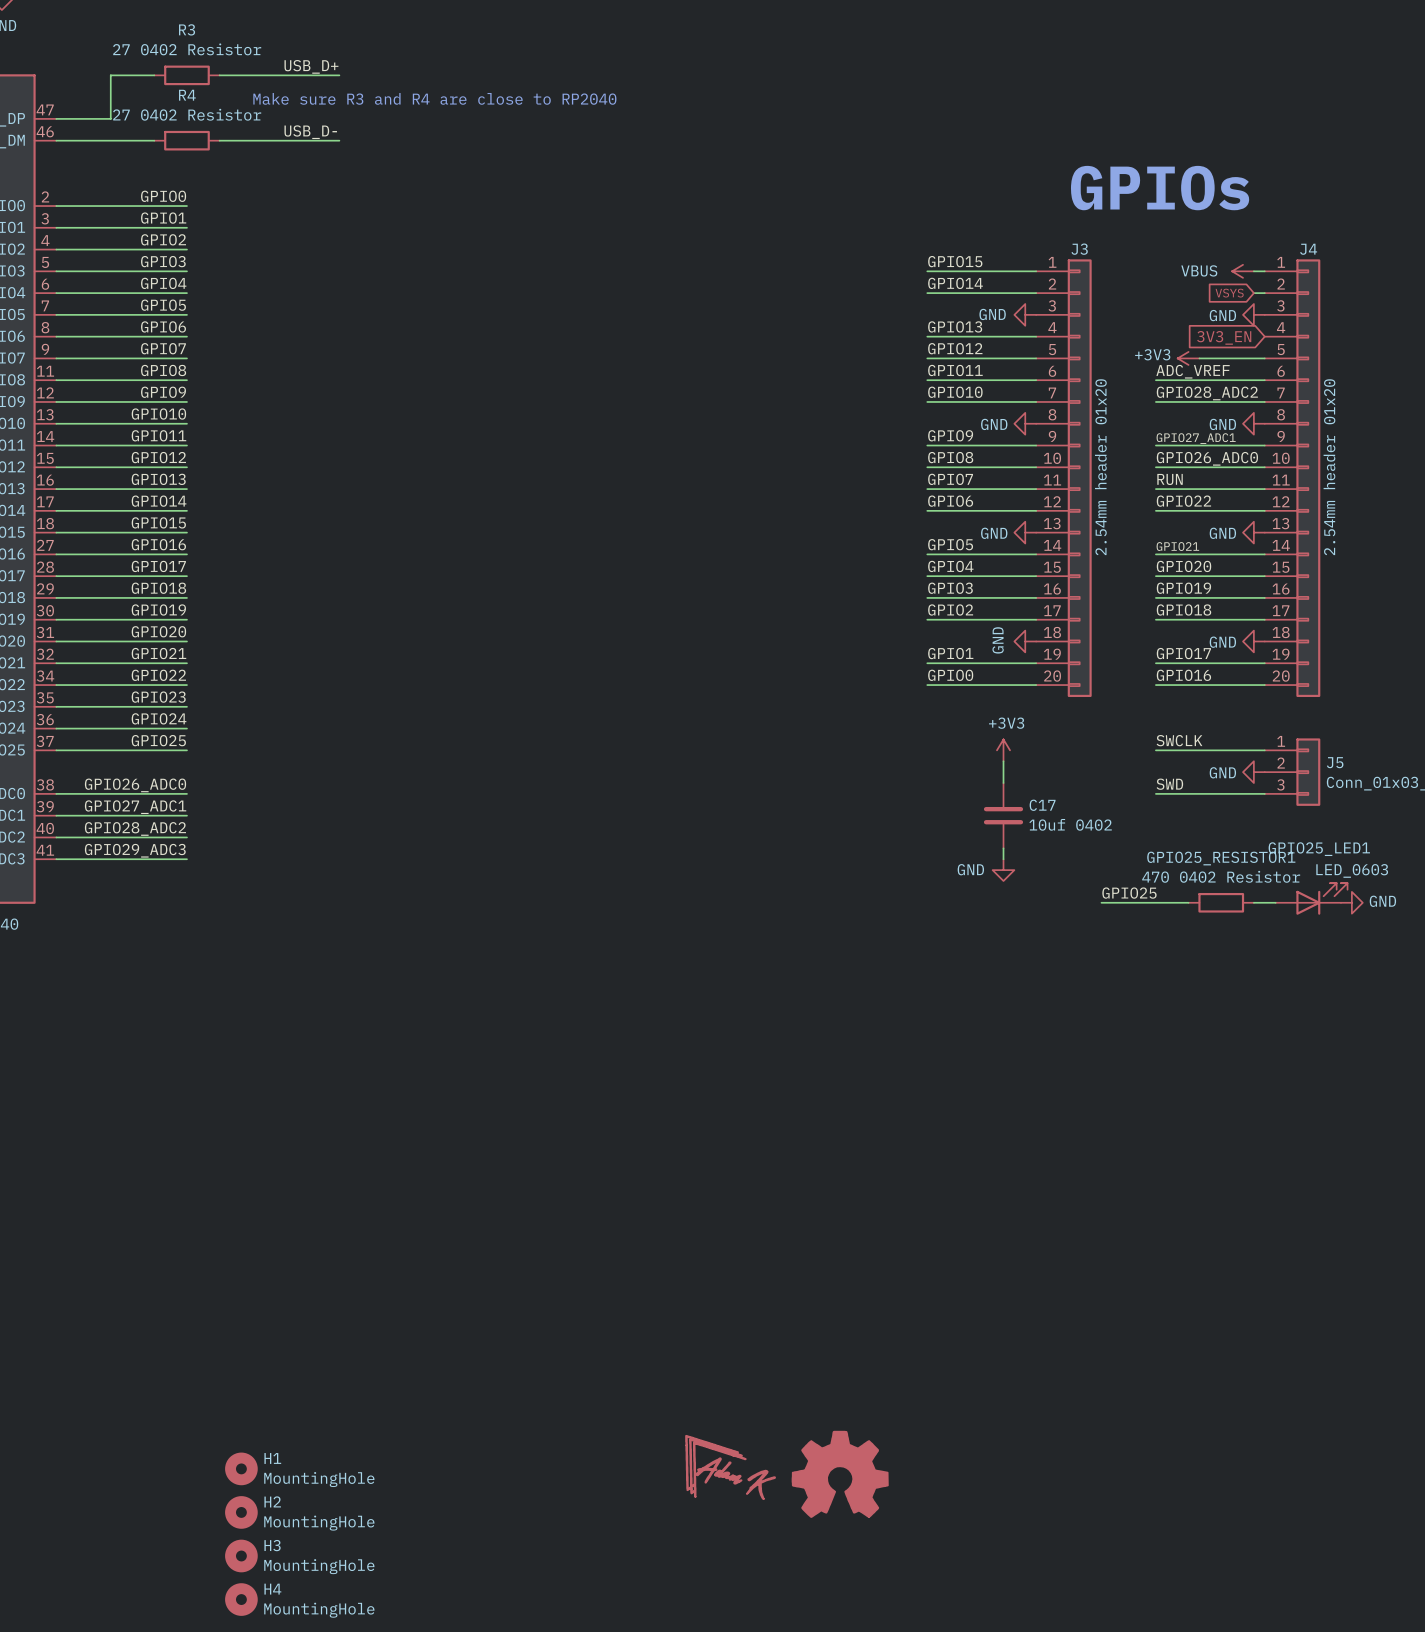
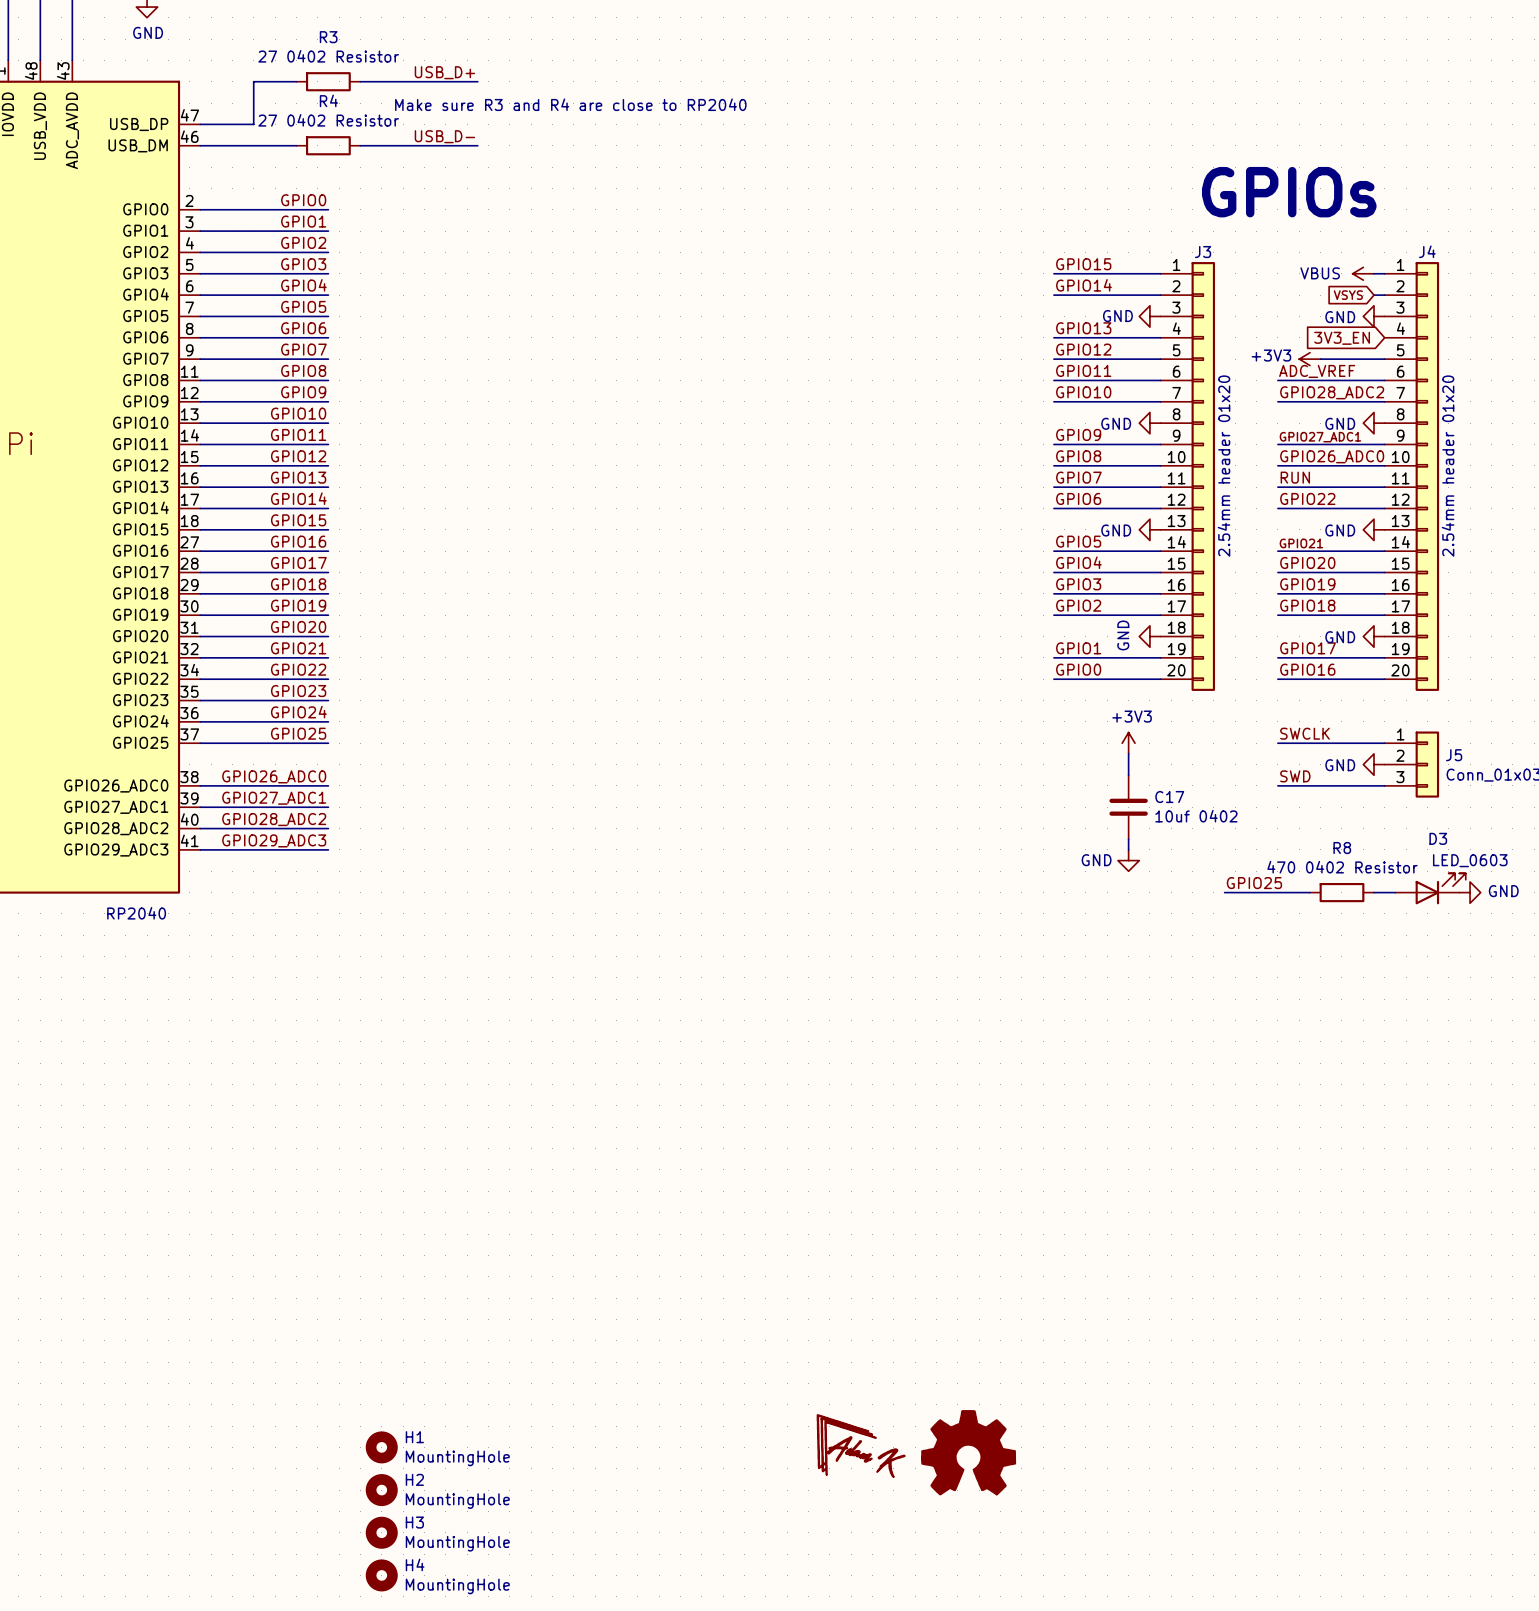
GPIO25_LED1 name: GPIO25_LED1 (1319, 849) -> D3 (1438, 838)
GPIO25_RESISTOR1 name: GPIO25_RESISTOR1 (1221, 858) -> R8 (1342, 848)

